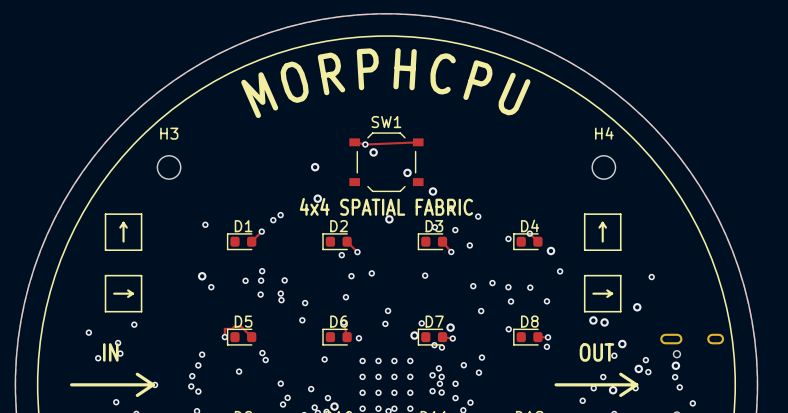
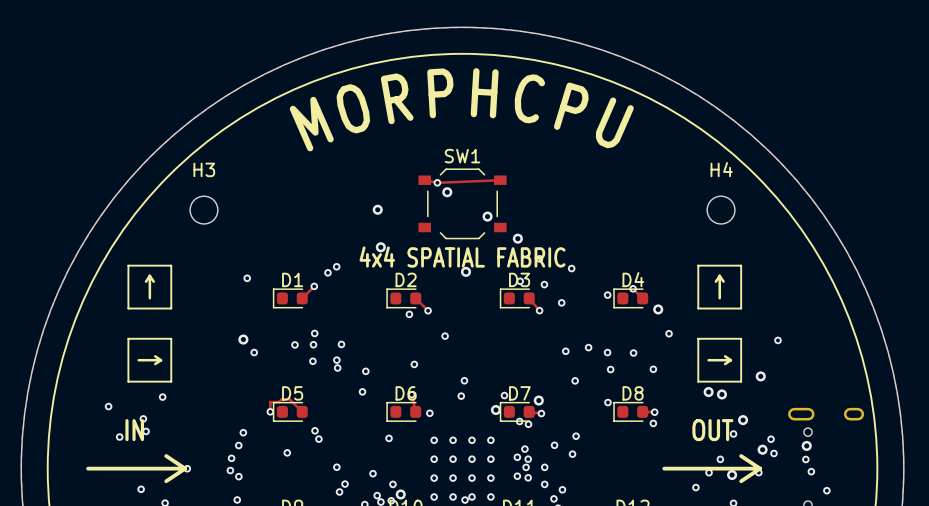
via: (425, 275) -> none
via: (351, 276) -> none

